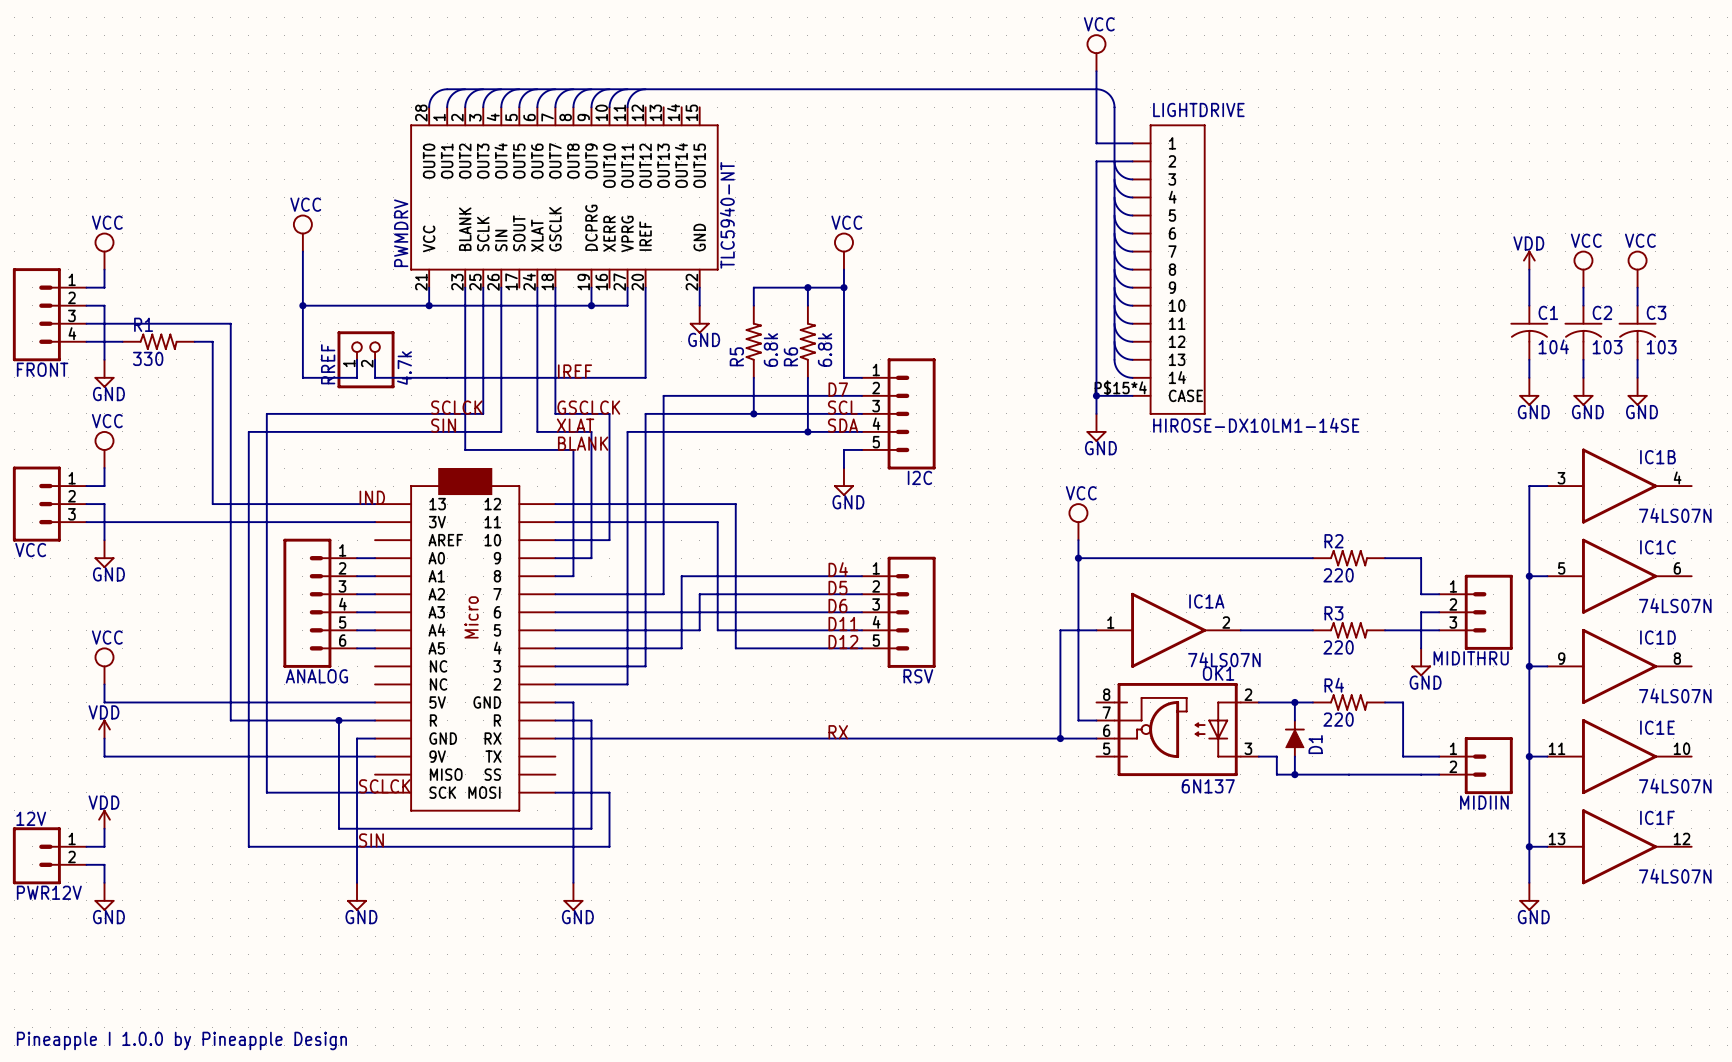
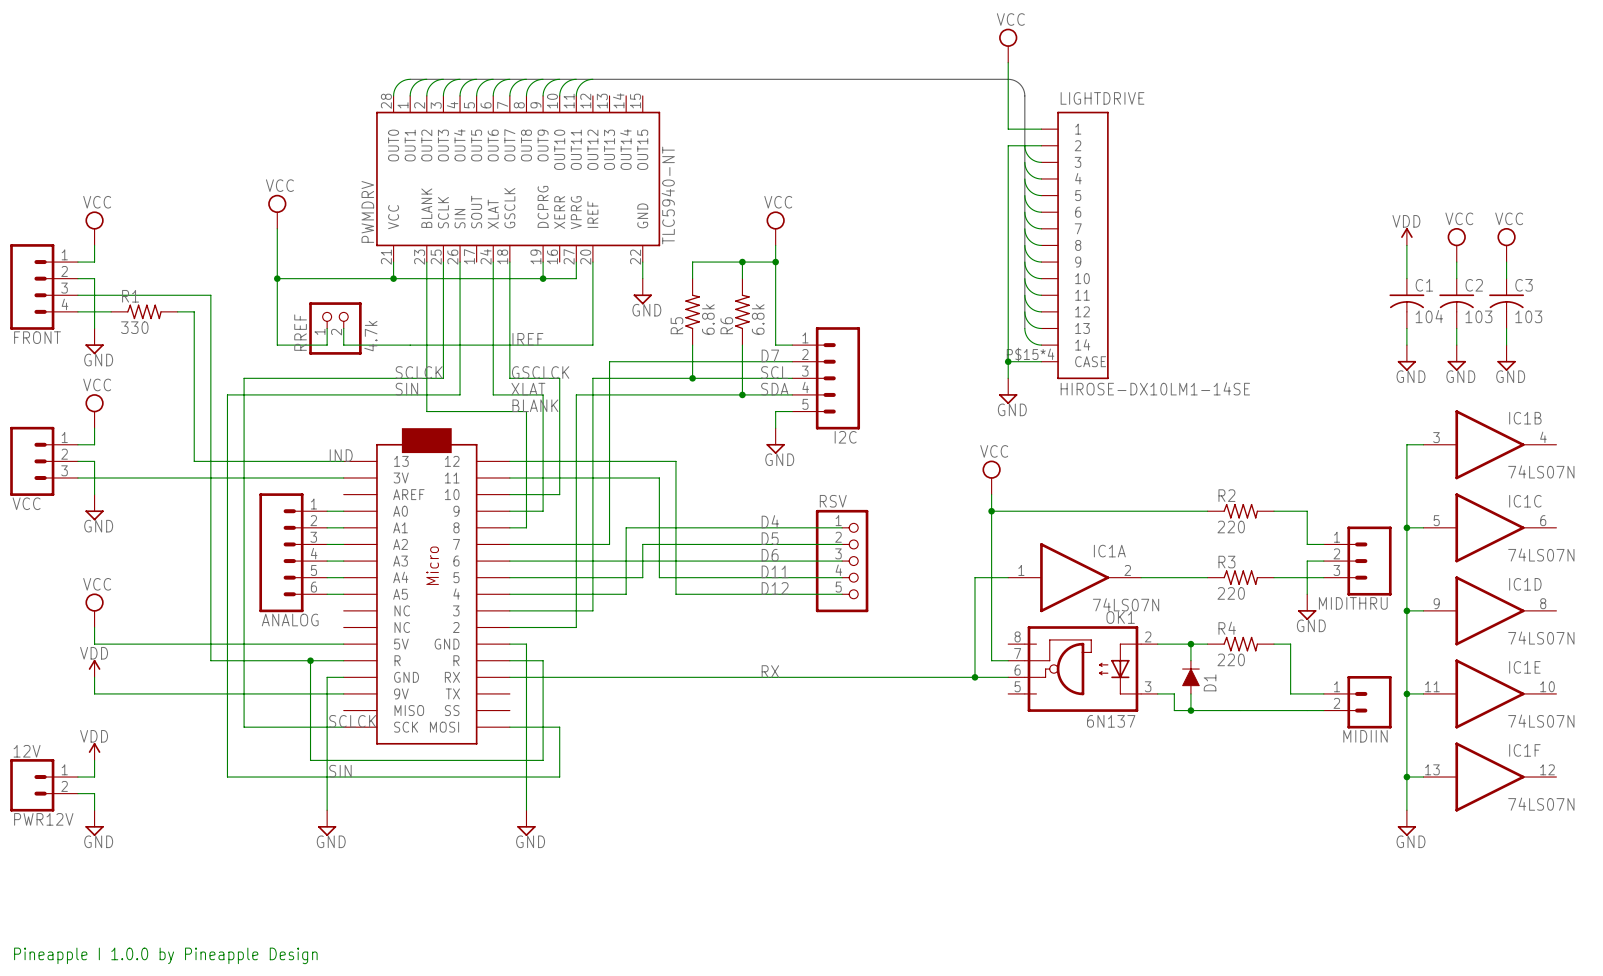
RSV: (898, 612) -> none
RSV: none -> (842, 561)

